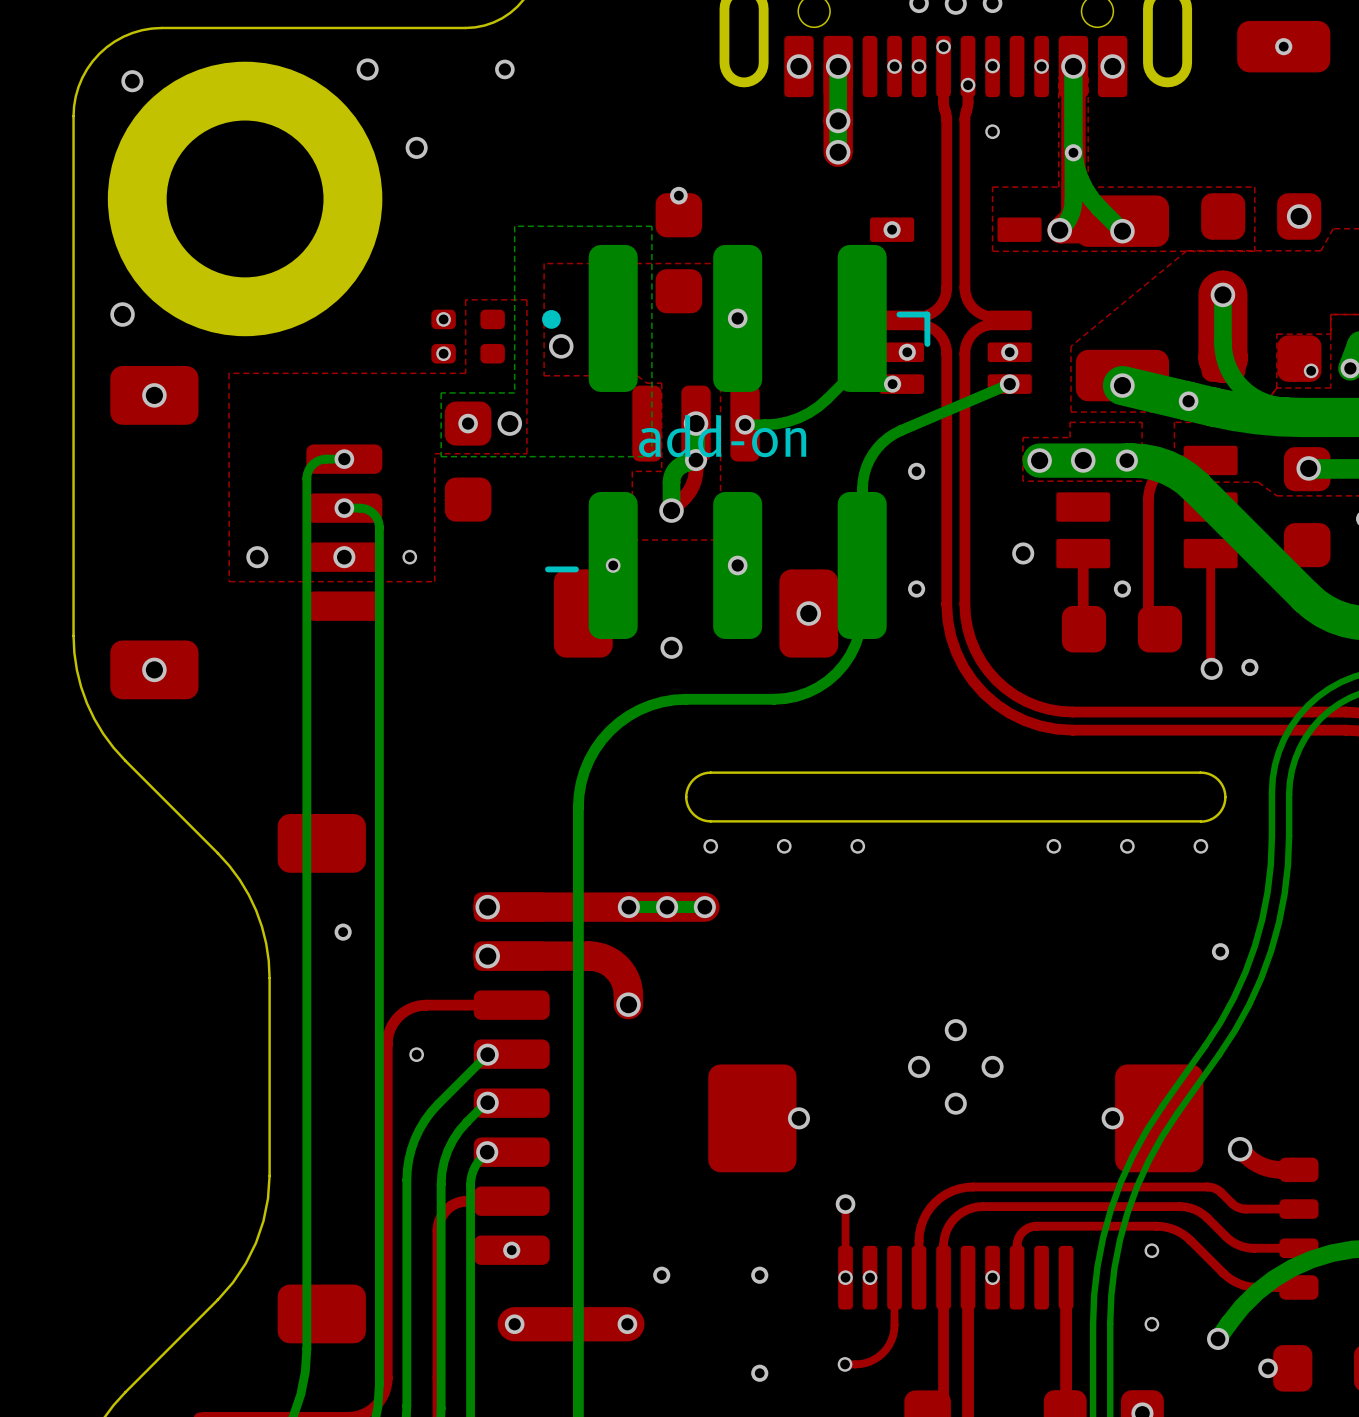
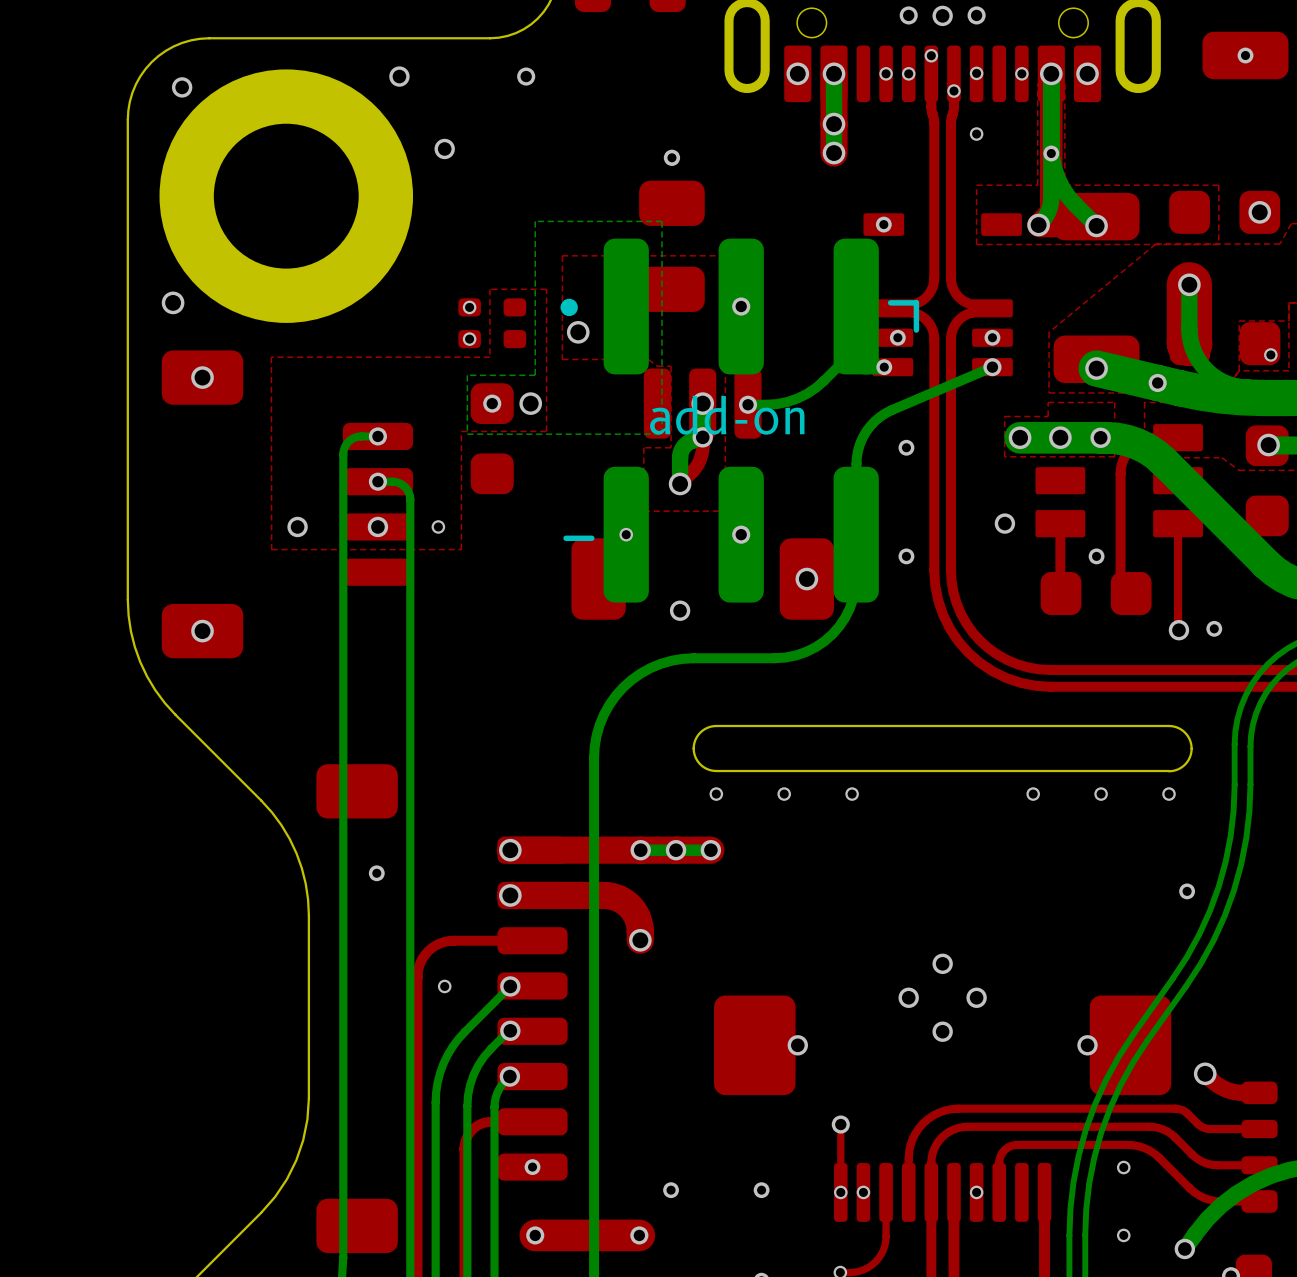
part footprint: [655, 193, 703, 314] -> [639, 180, 705, 312]
via position: (678, 195) -> (671, 157)

